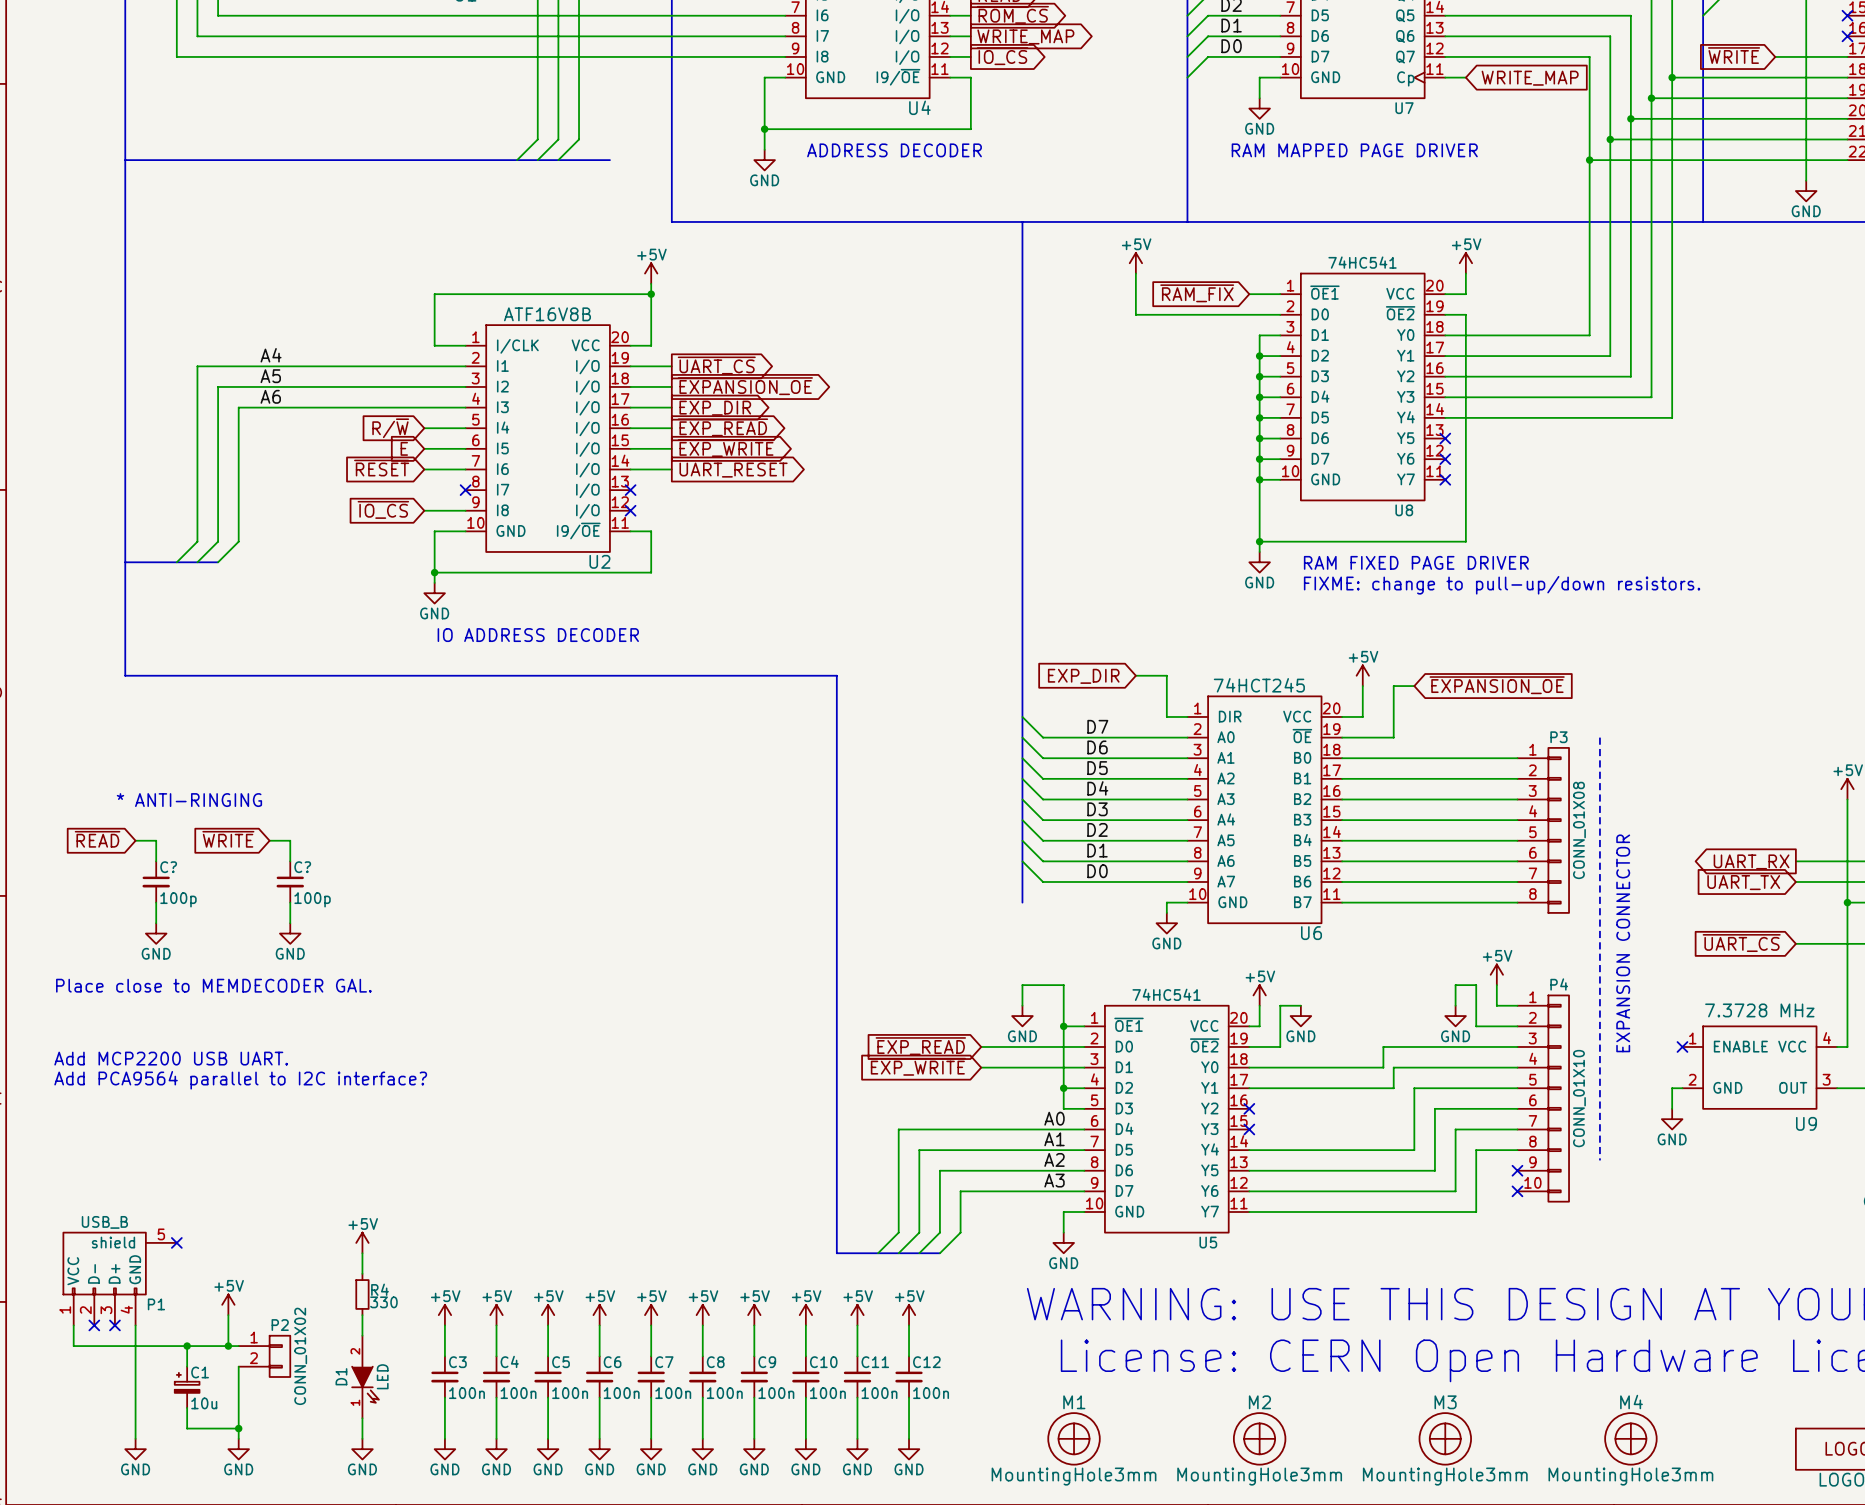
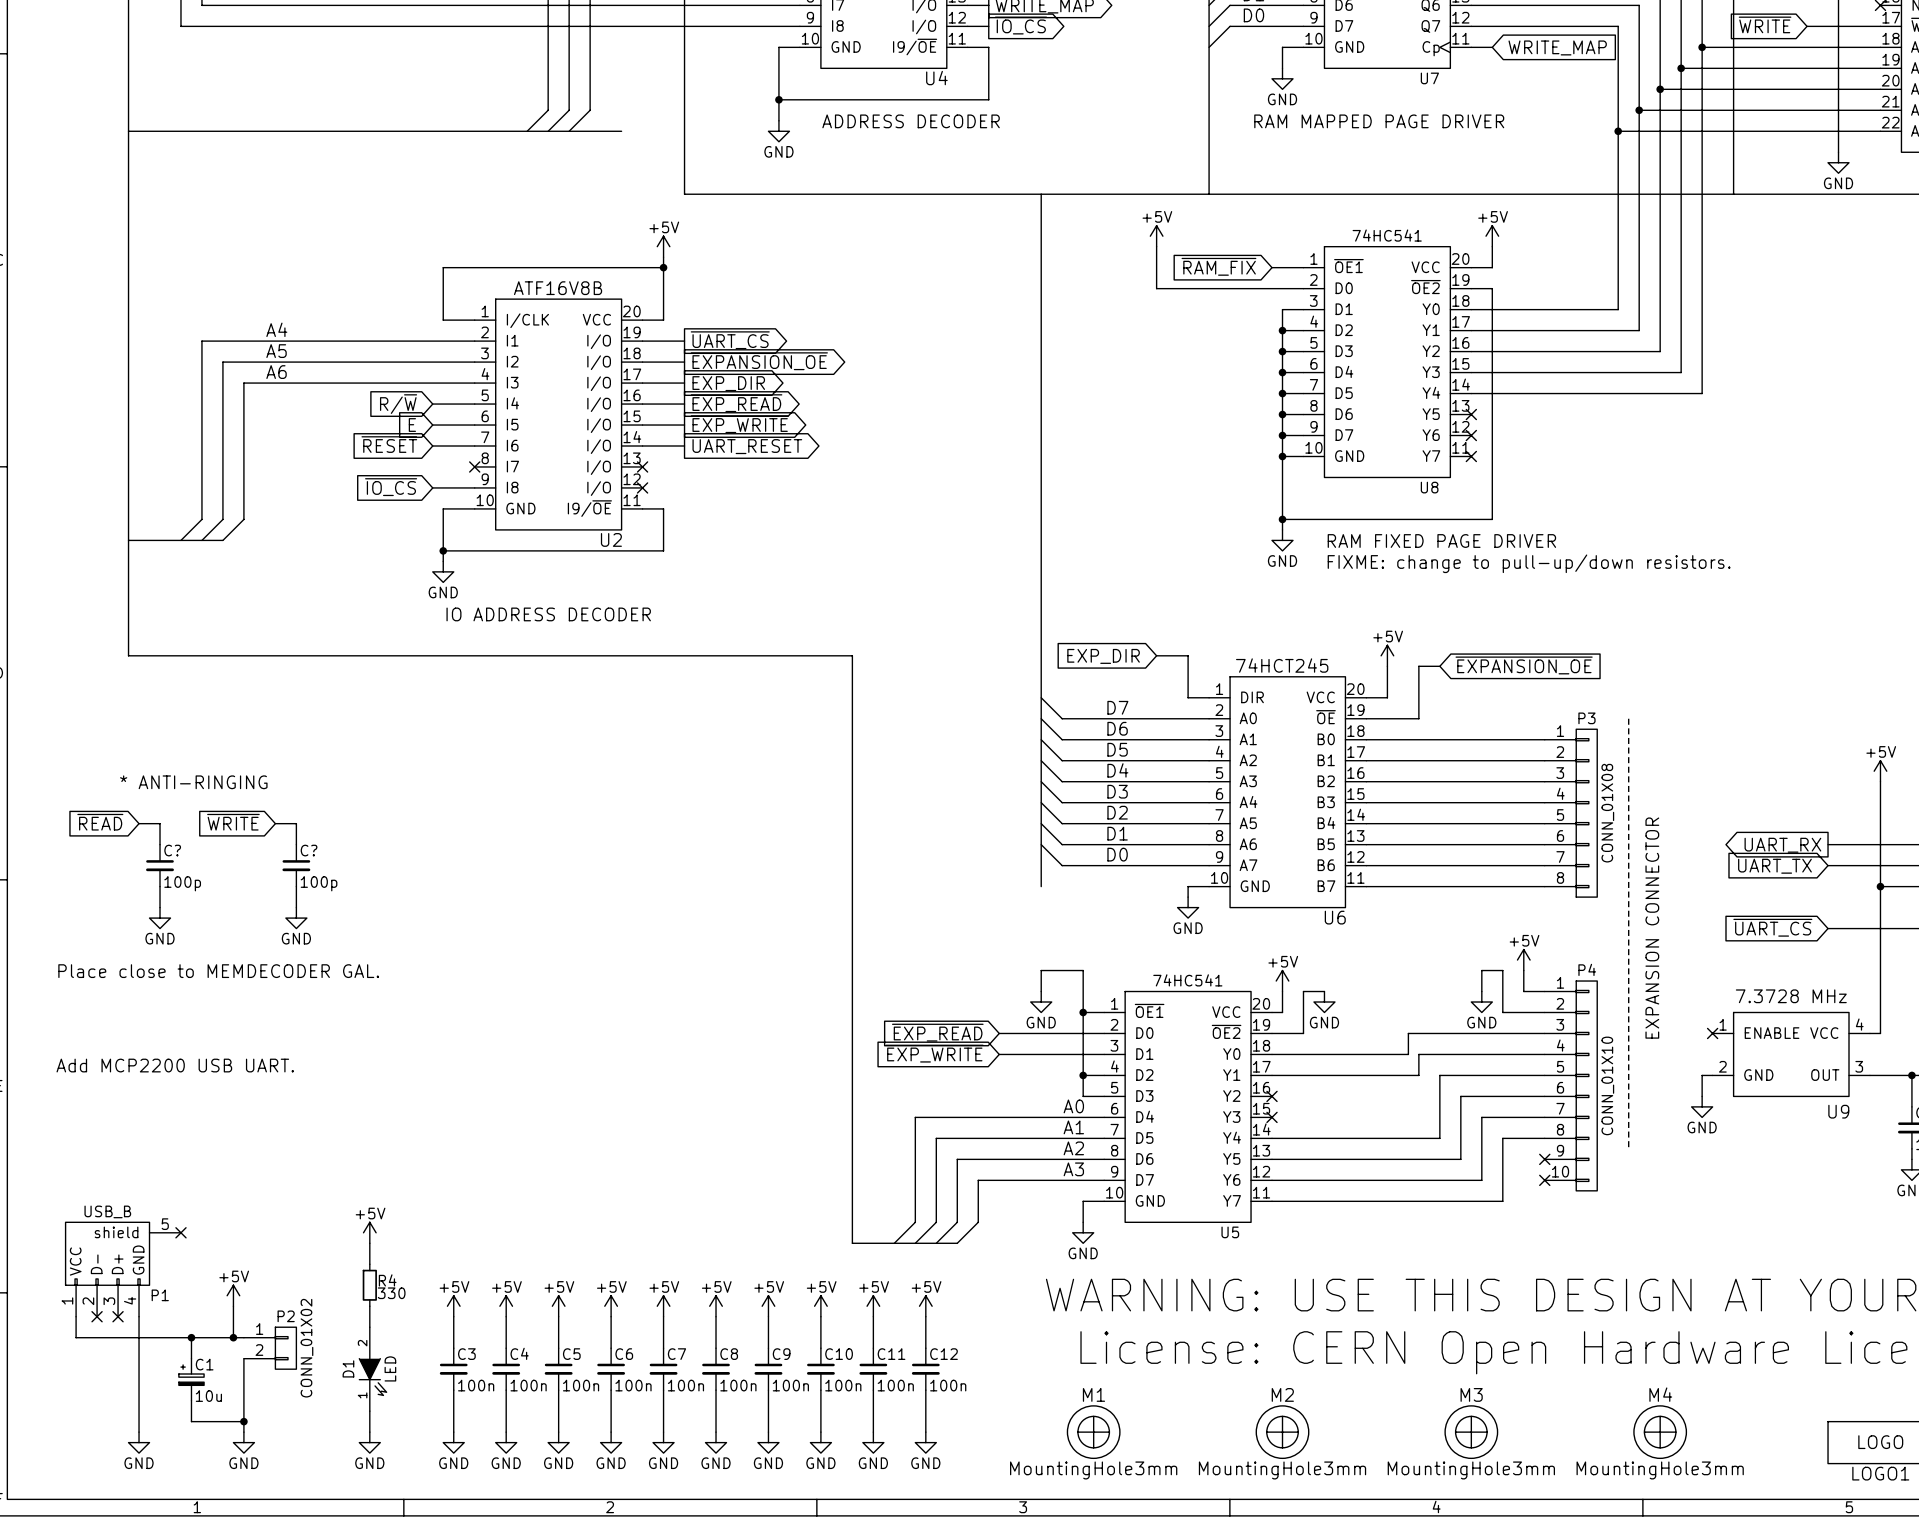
text: Add MCP2200 USB UART. (171, 1058) -> none
text: Add PCA9564 parallel to I2C interface? (240, 1080) -> Add MCP2200 USB UART. (175, 1065)

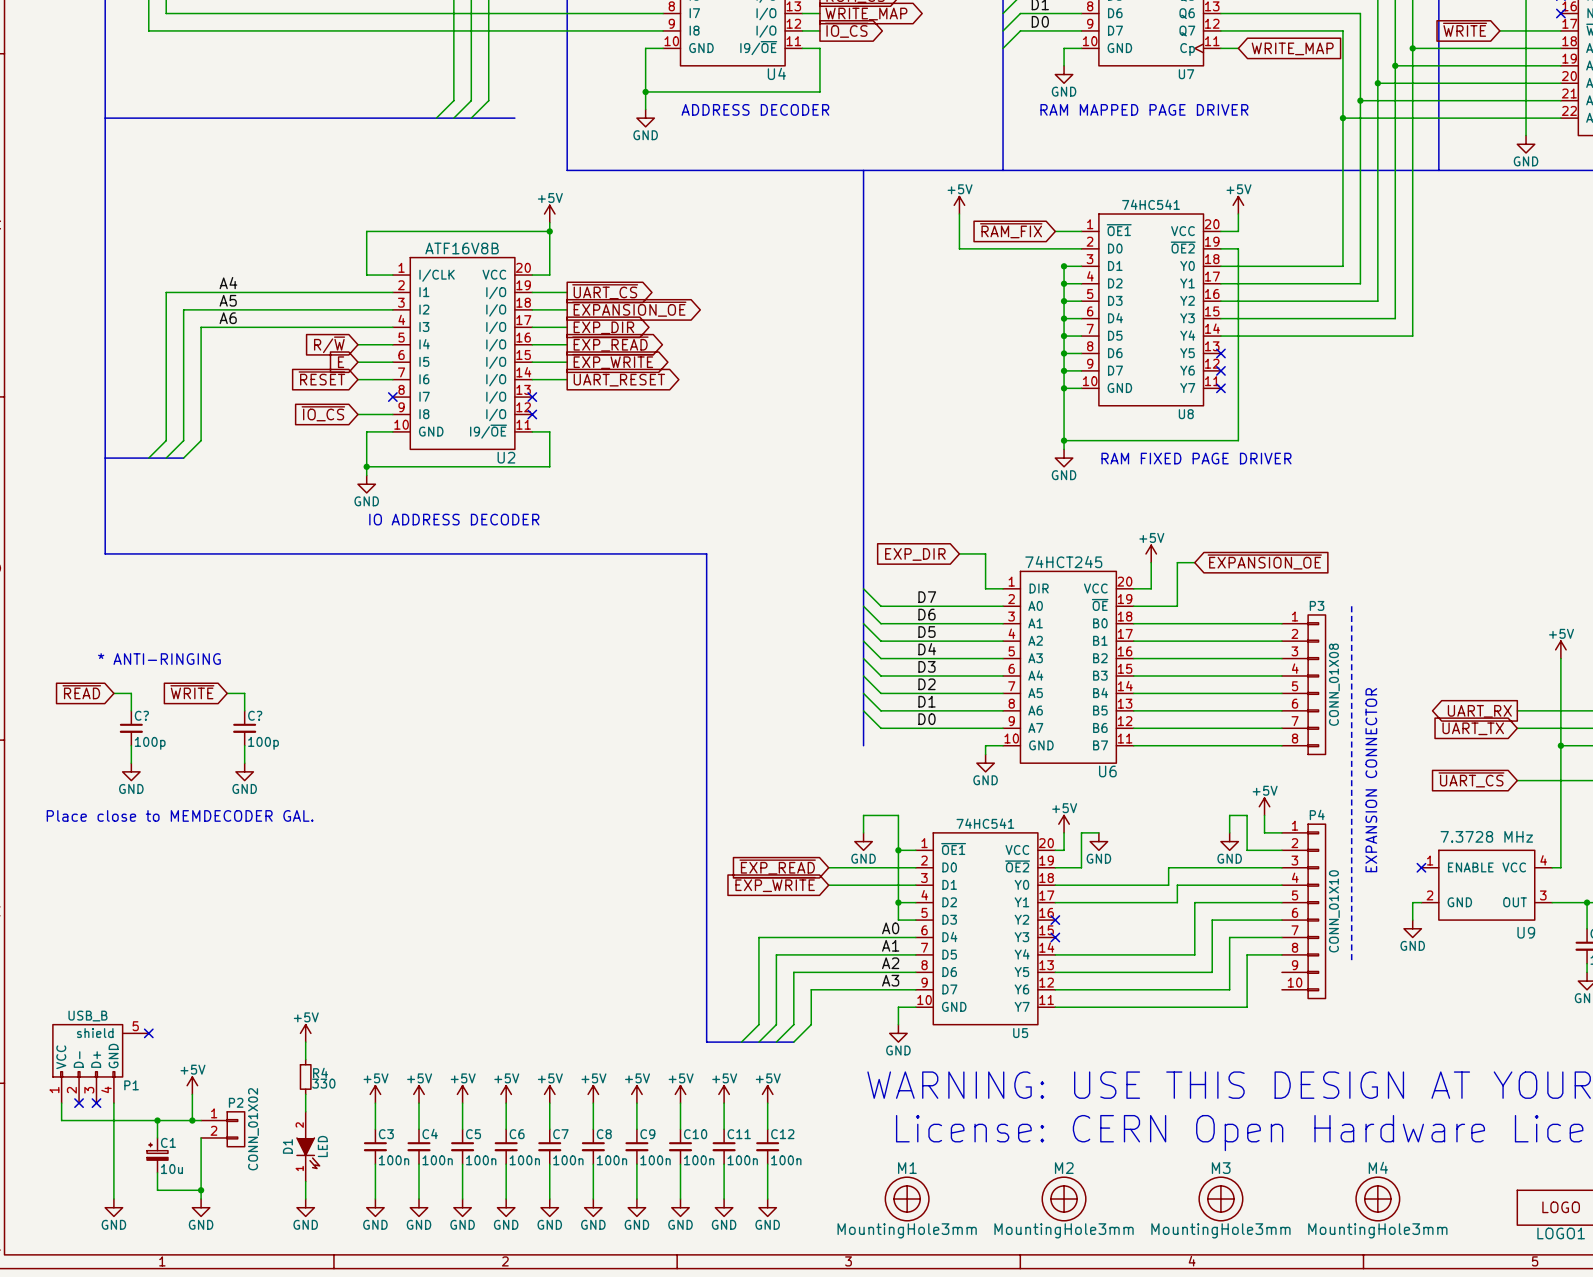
junction: none -> (1064, 266)
text: FIXME: change to pull-up/down resistors. (1529, 563) -> none
text: Add MCP2200 USB UART. (175, 1065) -> none
no-connect mark: (1544, 1159) -> none
no-connect mark: (1544, 1180) -> none

